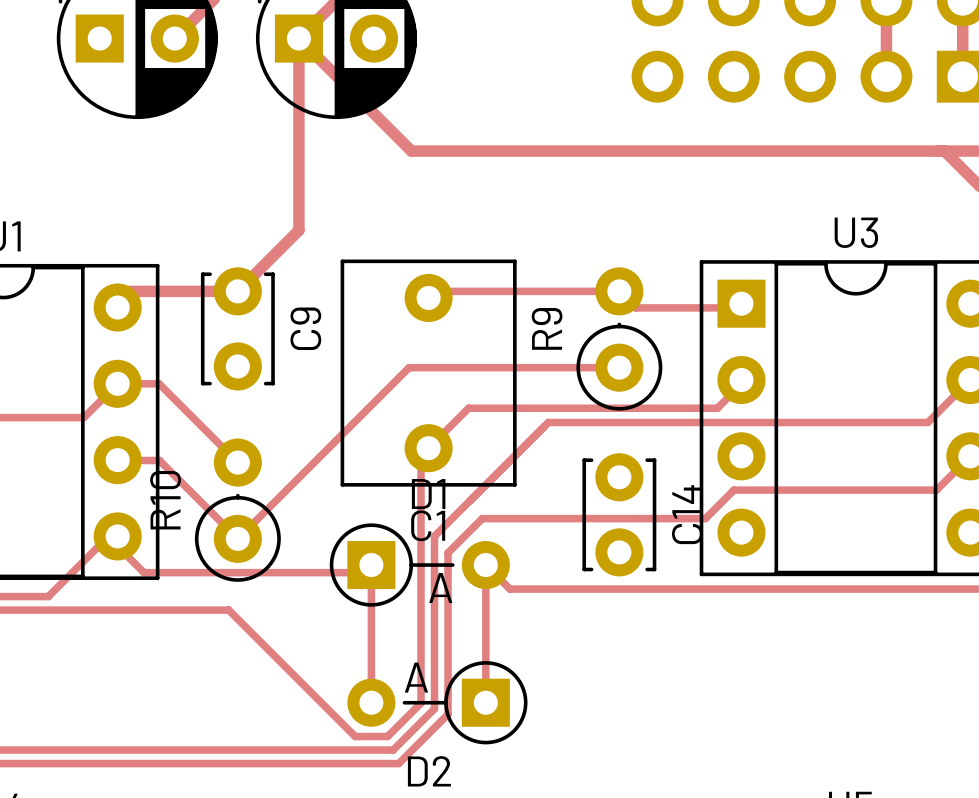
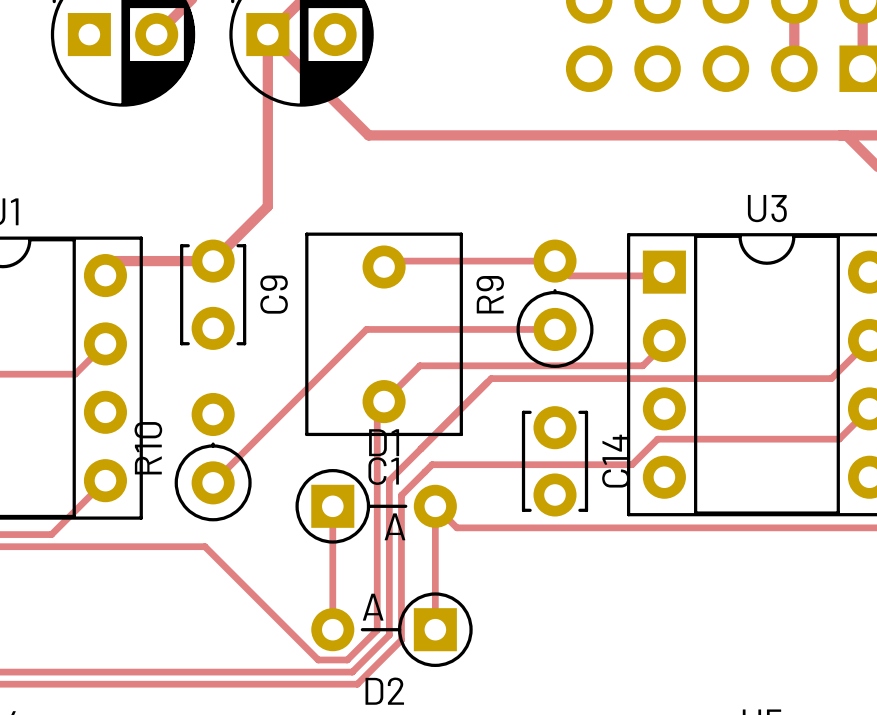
track: (117, 383) (159, 383) (237, 462) -> none
track: (108, 460) (159, 460) (237, 538) -> none
track: (363, 572) (144, 572) (108, 536) (48, 596) -> (105, 480) (51, 534) (43, 534)

